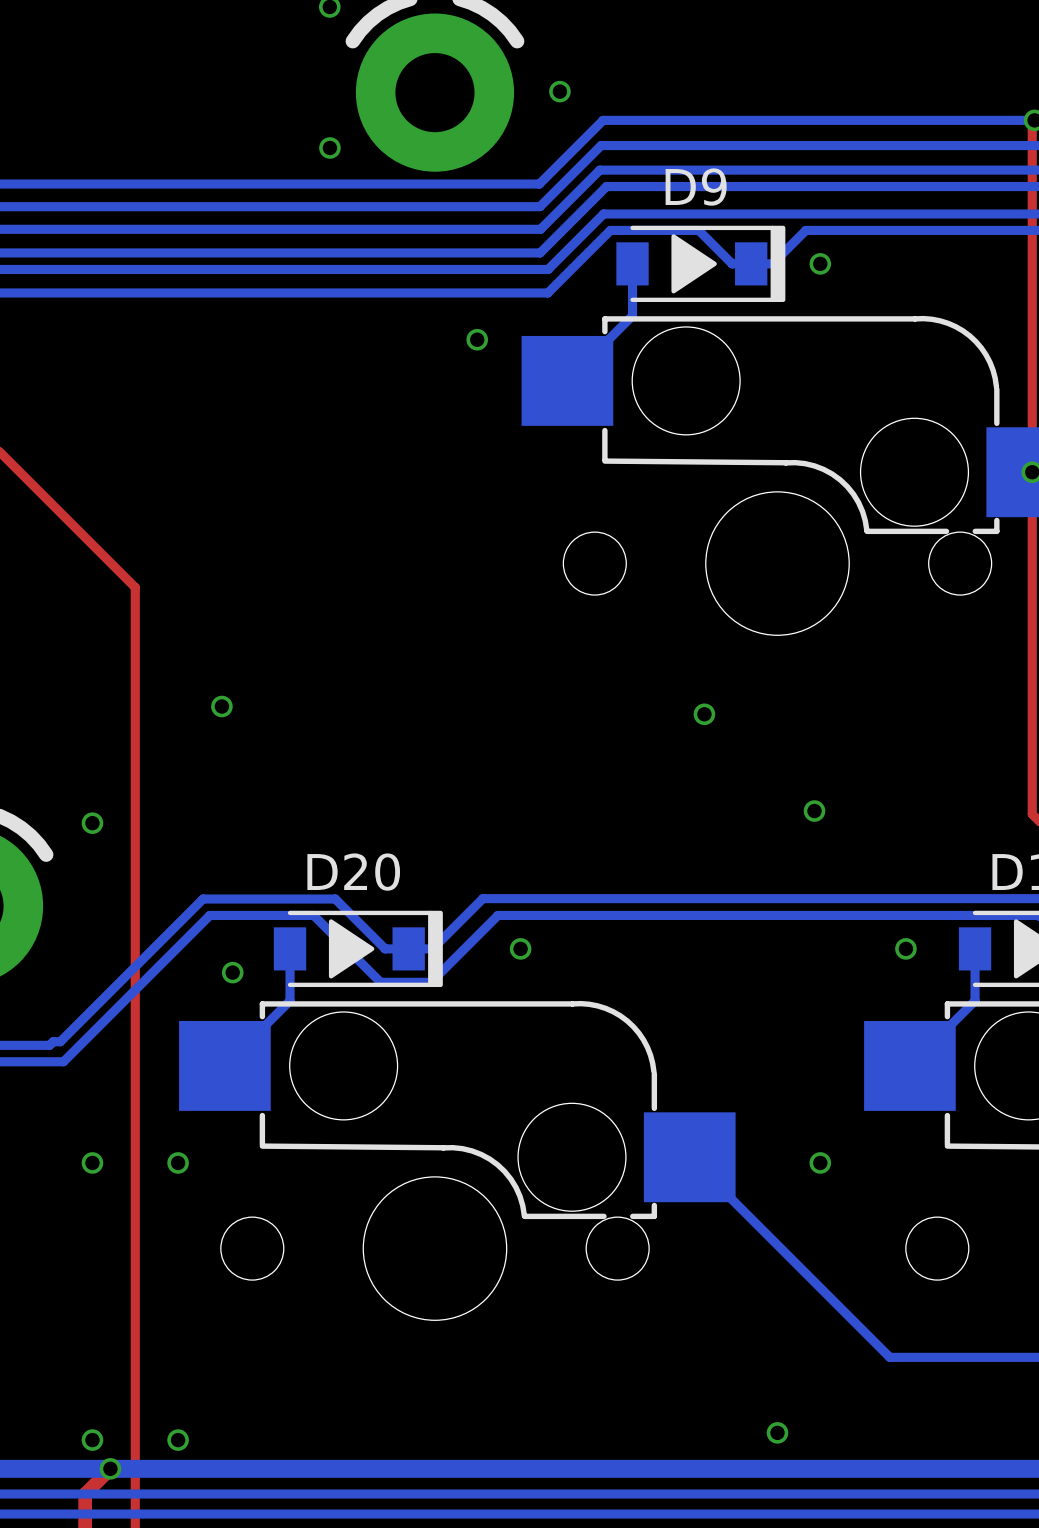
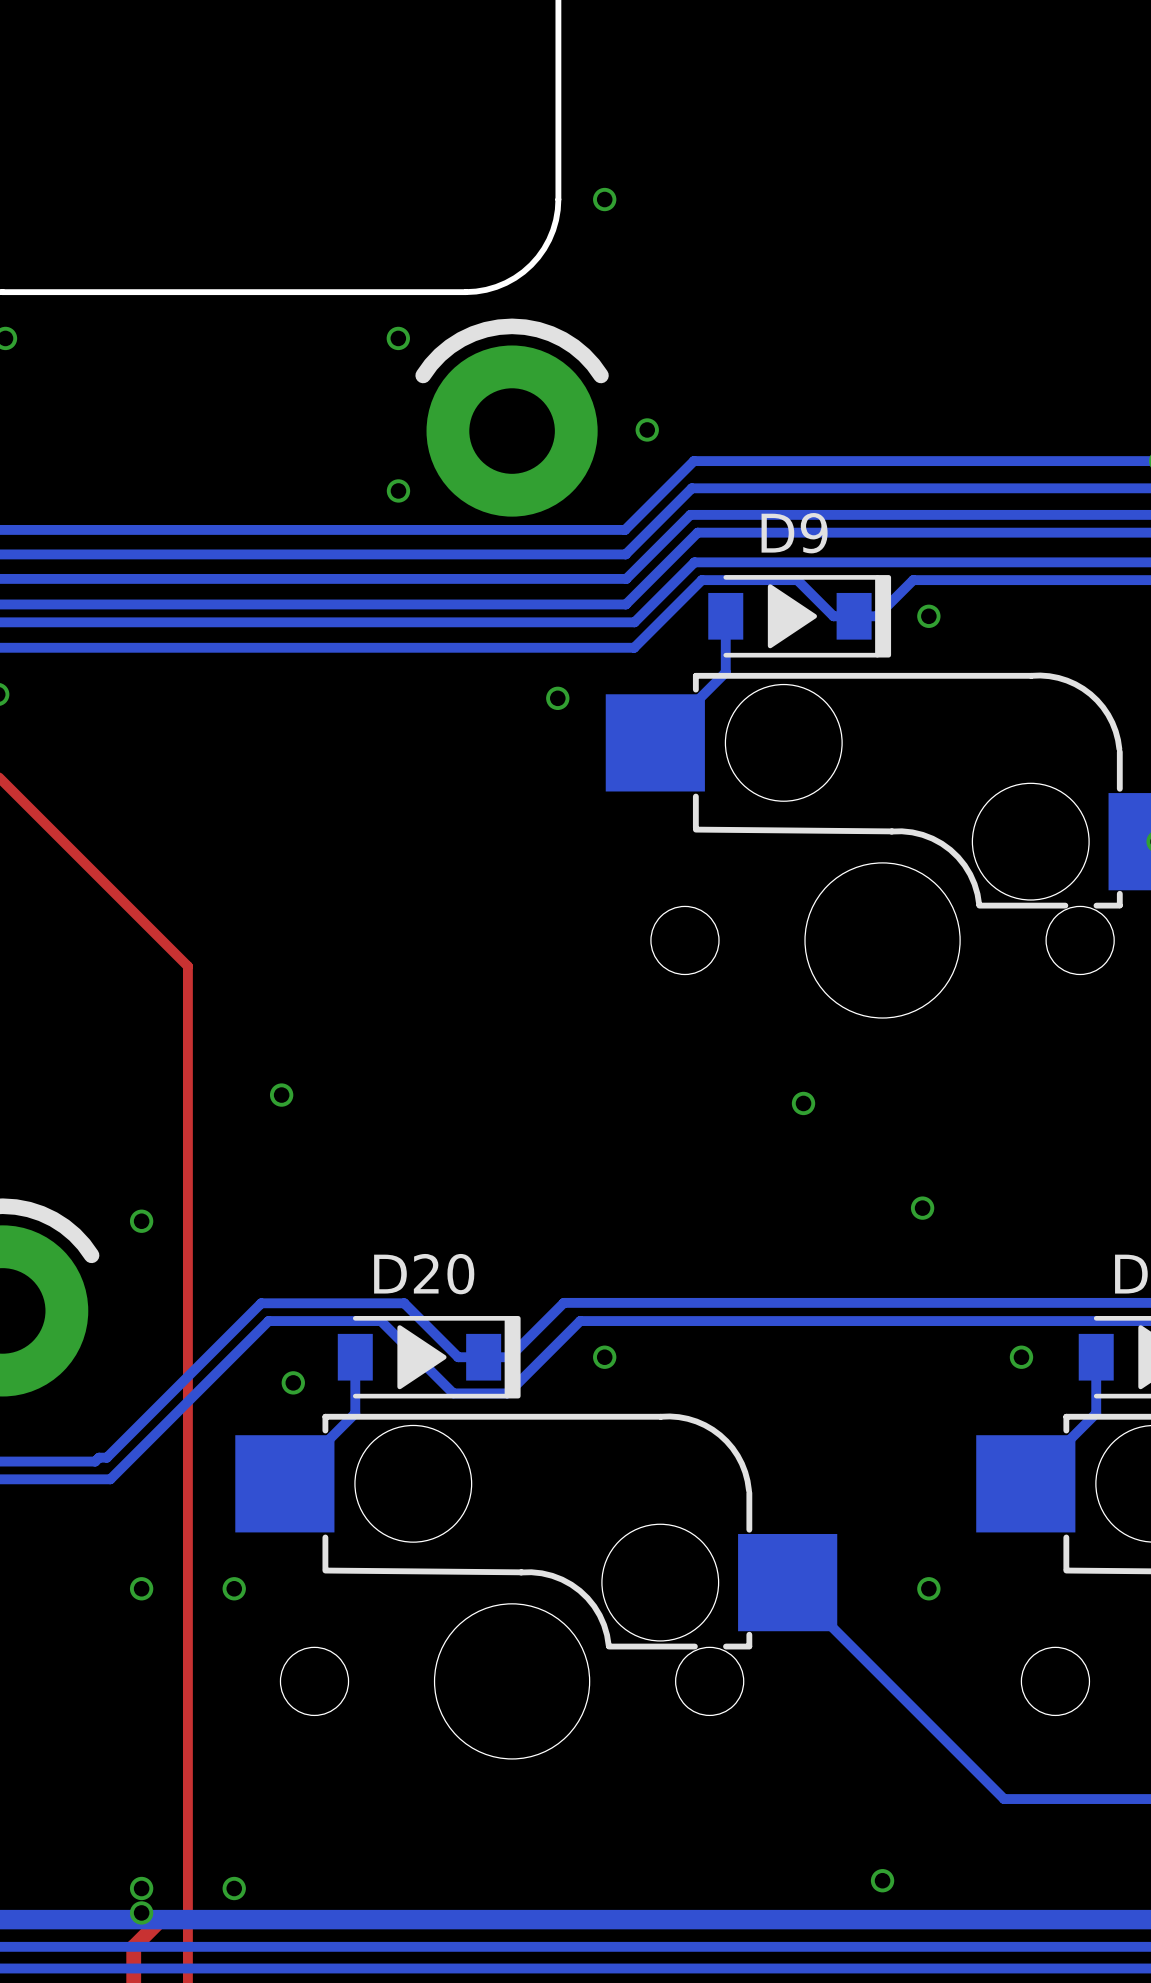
via position: (110, 1468) -> (141, 1912)

